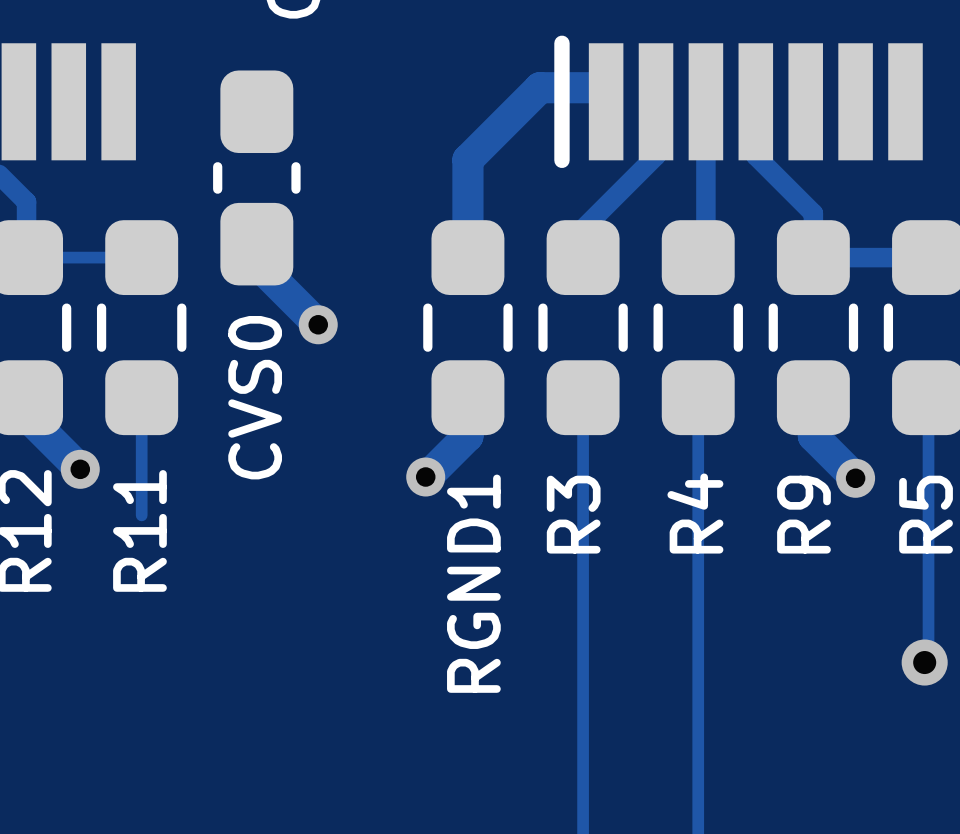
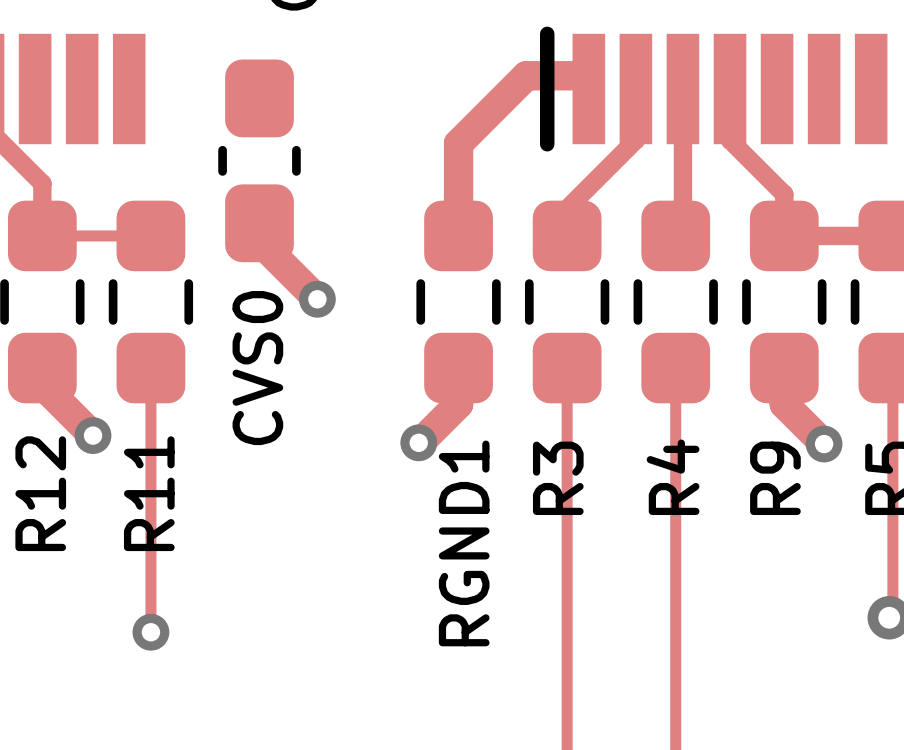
track: none -> (150, 479) (150, 632)
via: none -> (150, 632)

